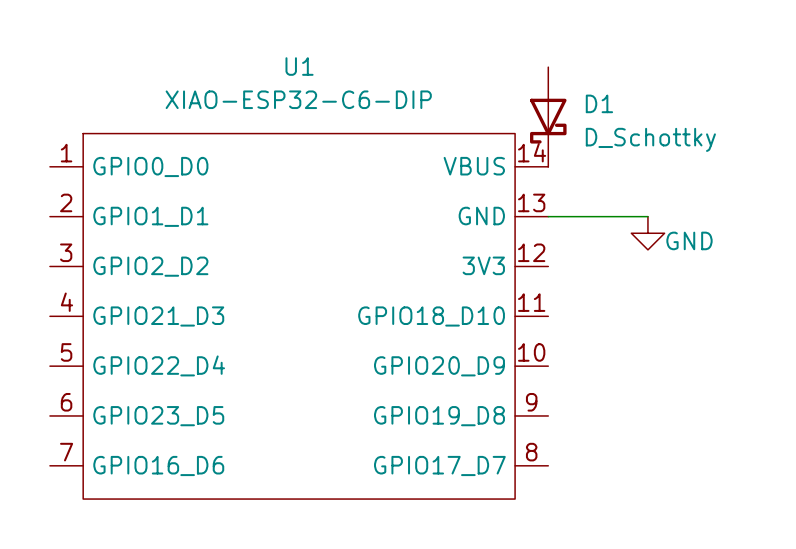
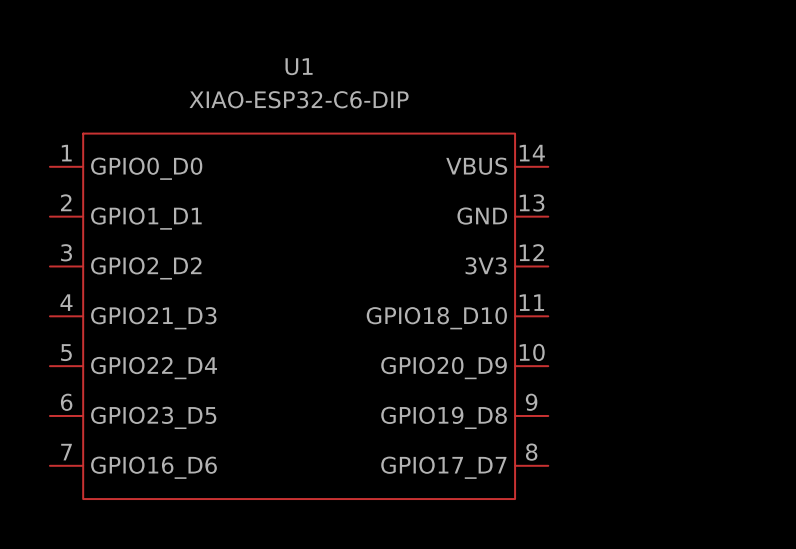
D1: D_Schottky (548, 116) -> none
wire: (548, 216) (647, 216) -> none
power symbol: GND (647, 233) -> none

